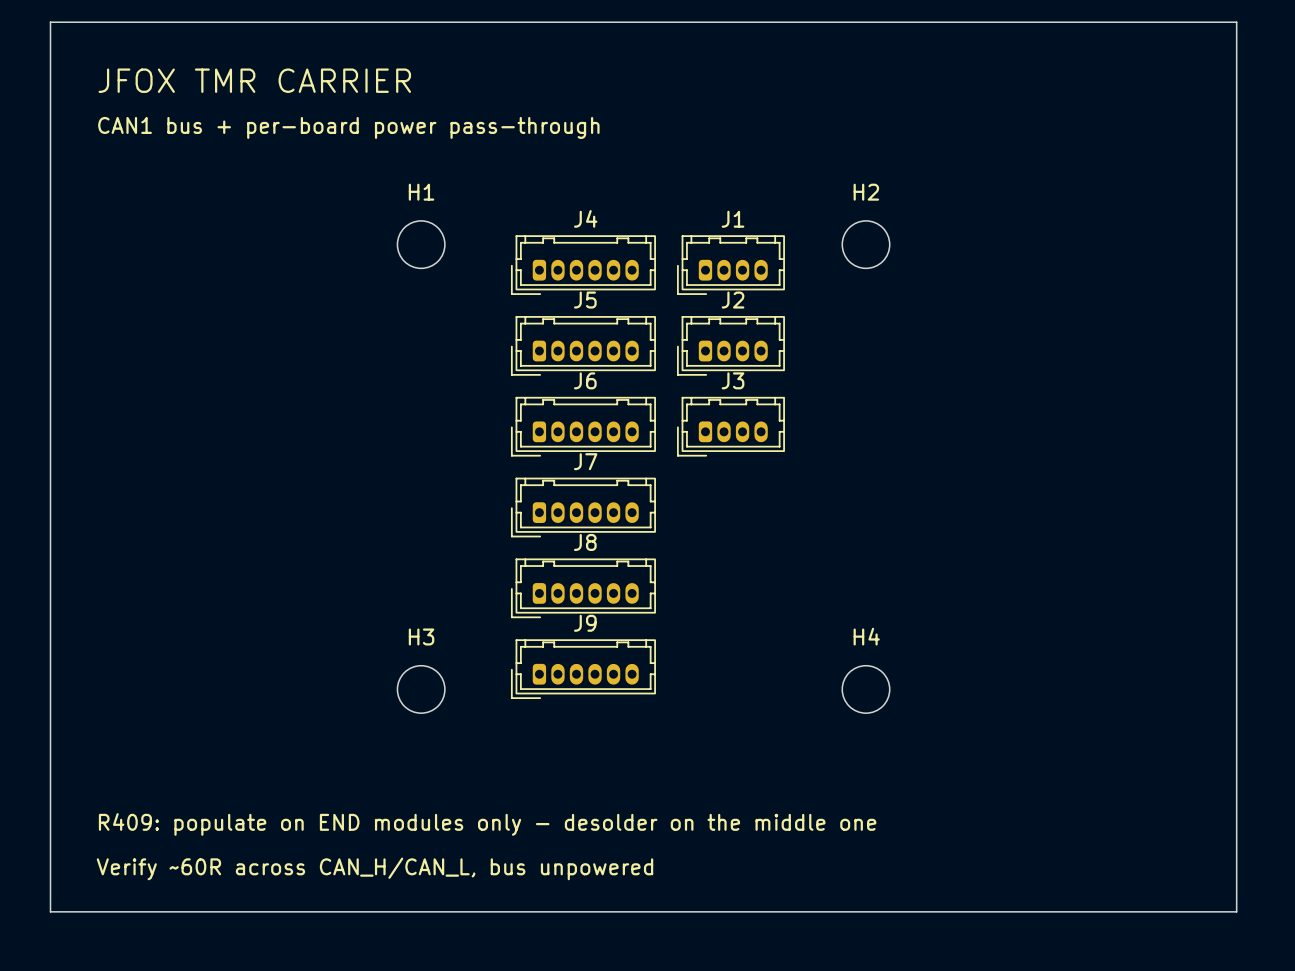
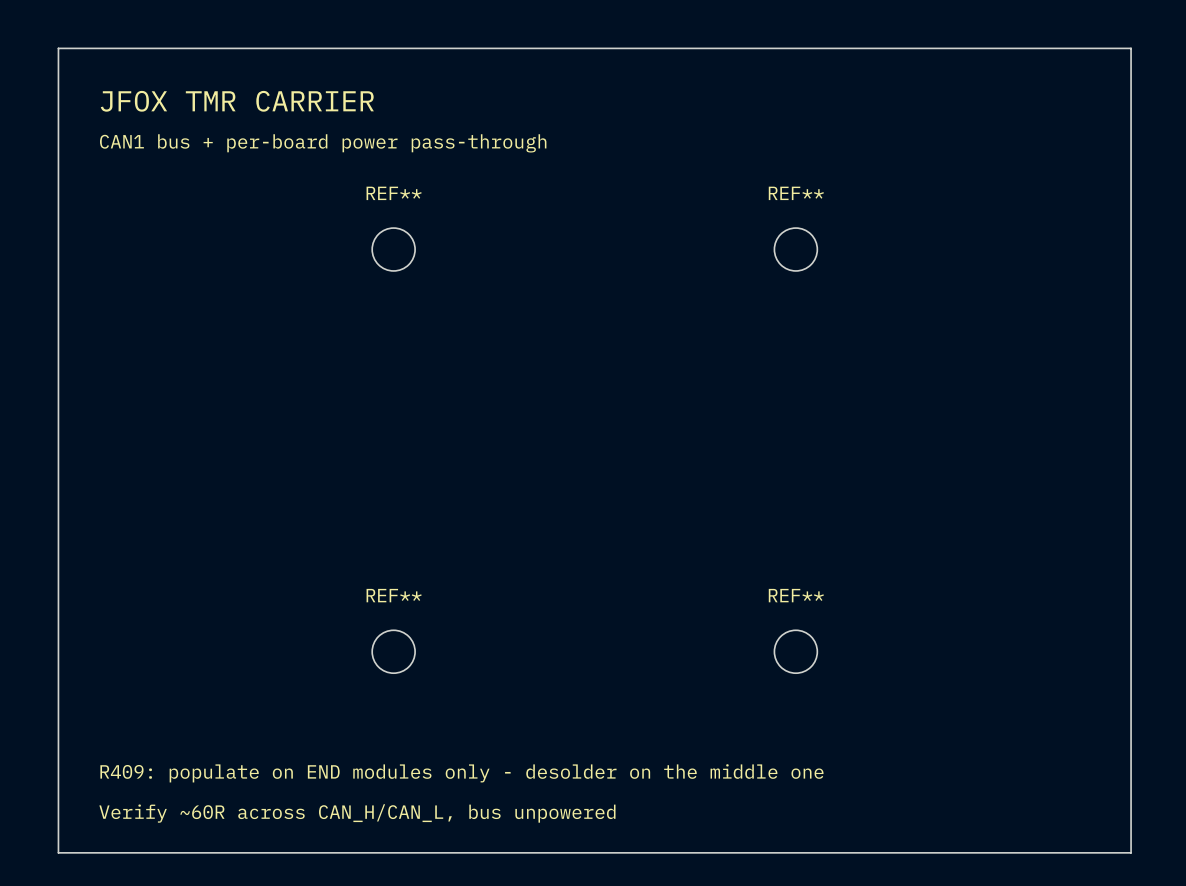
H1 name: H1 (421, 192) -> REF** (394, 193)
H2 name: H2 (866, 192) -> REF** (796, 193)
J4: (583, 265) -> none
J1: (730, 265) -> none
J5: (583, 345) -> none
J2: (730, 345) -> none
J6: (583, 426) -> none
J3: (730, 426) -> none
J7: (583, 507) -> none
J8: (583, 588) -> none
H3 name: H3 (421, 636) -> REF** (394, 595)
H4 name: H4 (866, 636) -> REF** (796, 595)
J9: (583, 669) -> none

